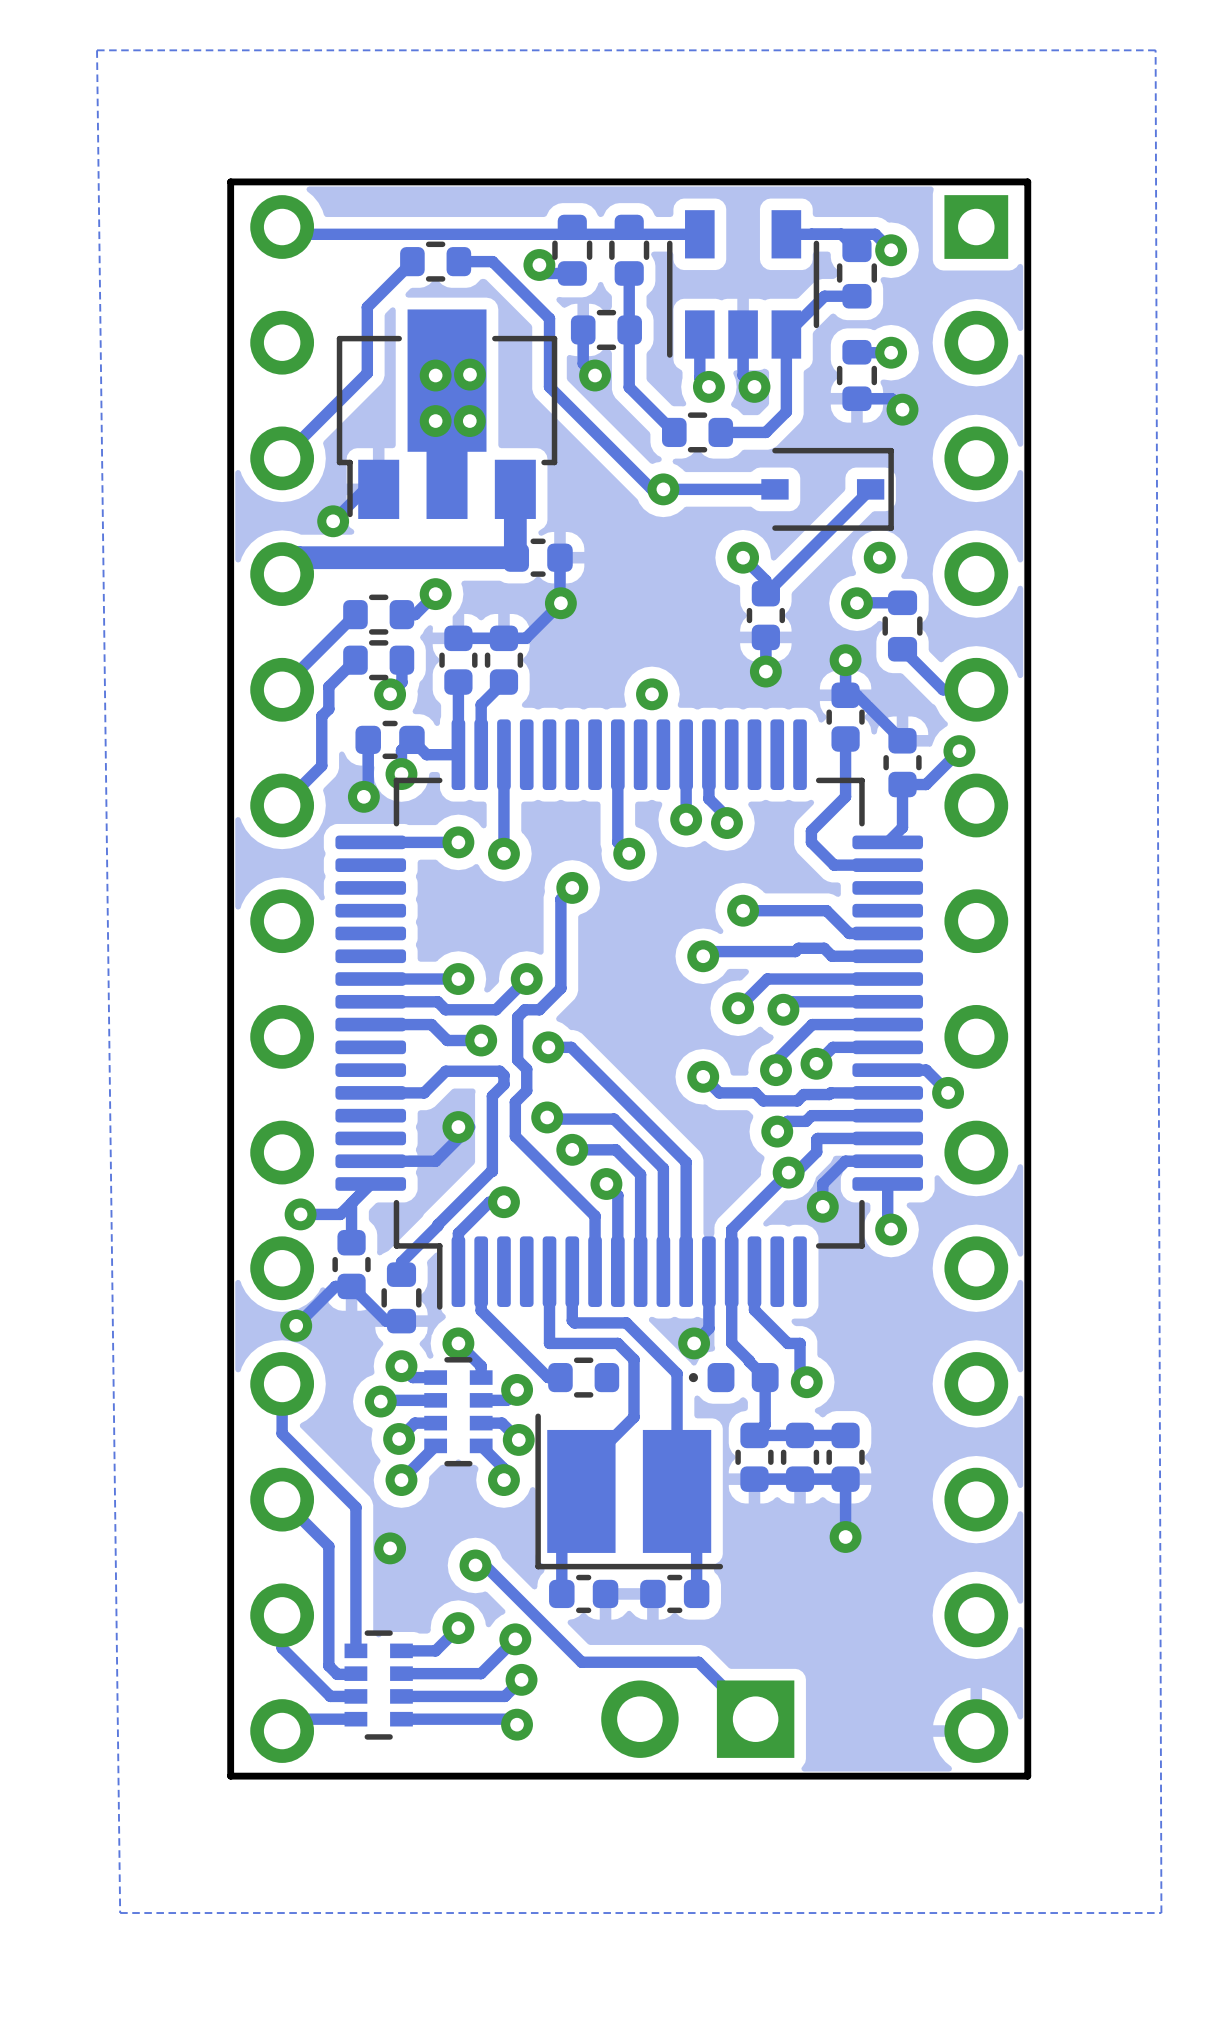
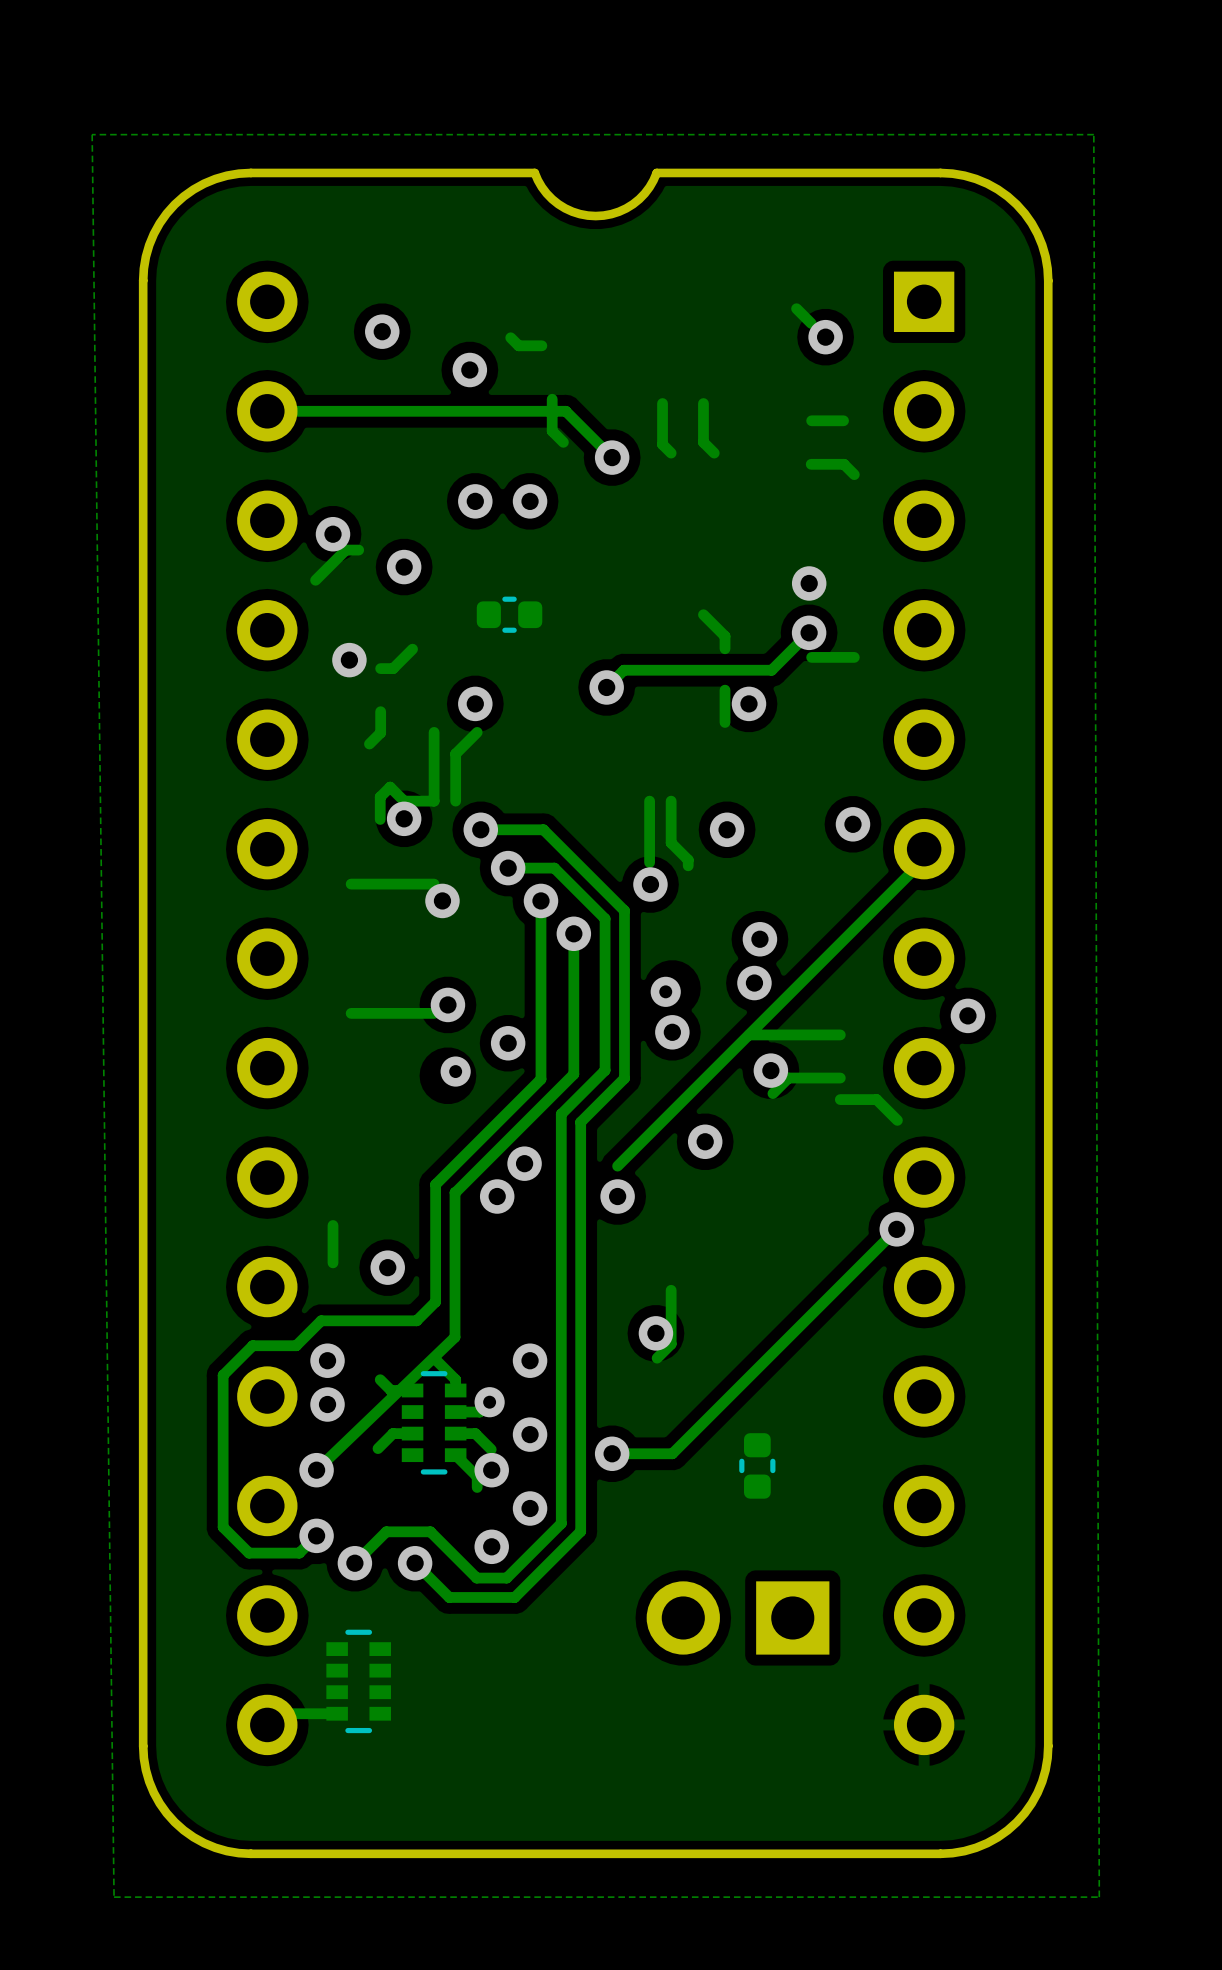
board edge: (1027, 181) (230, 181) (230, 1776) (1027, 1776) (1027, 181) -> (940, 172) (976, 179) (1007, 196) (1024, 213) (1037, 233) (1047, 268) (1048, 1746) (1045, 1770) (1037, 1792) (1024, 1813) (1007, 1830) (976, 1847) (952, 1853) (250, 1853) (226, 1851) (204, 1843) (183, 1830) (159, 1803) (145, 1770) (143, 1746) (143, 280) (145, 256) (153, 233) (166, 213) (183, 196) (204, 183) (238, 173) (534, 172) (541, 187) (558, 204) (579, 214) (595, 216) (619, 211) (633, 204) (649, 187) (656, 172) (940, 172)
track: (282, 227) (289, 234) (699, 234) -> none
track: (786, 234) (875, 234) (891, 250) -> none
part: (572, 250) -> none
part: (629, 250) -> none
via position: (891, 250) -> (825, 337)
via: none -> (382, 331)
part: (435, 261) -> none
track: (458, 261) (492, 261) (549, 318) (549, 386) (651, 489) (774, 489) -> none
track: (412, 262) (367, 307) (367, 373) (282, 458) -> none
via: (539, 265) -> none
track: (629, 273) (629, 387) (674, 432) -> none
part: (856, 273) -> none
part: (743, 284) -> none
track: (856, 296) (824, 296) (786, 334) (786, 411) (765, 432) (720, 432) -> none
via: none -> (469, 370)
part: (606, 329) -> none
track: none -> (267, 411) (565, 411) (612, 457)
via: (891, 352) -> none
via: (469, 374) -> none
via: (435, 375) -> none
via: (595, 375) -> none
part: (856, 375) -> none
via: (708, 386) -> none
via: (754, 386) -> none
via: none -> (612, 457)
via: (902, 409) -> none
part: (447, 414) -> none
via: (435, 421) -> none
via position: (469, 421) -> (475, 501)
part: (697, 432) -> none
via: none -> (530, 501)
via: none -> (333, 534)
track: (515, 489) (516, 557) (298, 557) (282, 574) -> none
via: (663, 489) -> none
part: (827, 489) -> none
track: (870, 489) (766, 593) -> none
via: none -> (404, 567)
via: (333, 521) -> none
via: none -> (809, 583)
track: (559, 557) (560, 603) (525, 638) (458, 638) -> none
via: (743, 557) -> none
via: (879, 557) -> none
track: none -> (809, 632) (771, 670) (623, 670) (606, 687)
via: none -> (809, 632)
via: (435, 594) -> none
via: (560, 603) -> none
via: (856, 603) -> none
via: none -> (349, 660)
track: (355, 614) (282, 689) -> none
part: (378, 614) -> none
part: (765, 615) -> none
part: (902, 626) -> none
via: none -> (606, 687)
track: (902, 649) (943, 689) (976, 689) -> none
via: none -> (475, 703)
track: (355, 660) (328, 686) (328, 709) (321, 716) (321, 765) (282, 805) -> none
part: (378, 660) -> none
part: (458, 660) -> none
part: (503, 660) -> none
track: (845, 660) (845, 695) (856, 695) (902, 740) -> none
via: (845, 660) -> none
via position: (765, 671) -> (748, 703)
via: (390, 694) -> none
via: (651, 694) -> none
part: (845, 717) -> none
track: (845, 738) (845, 796) (811, 830) (811, 842) (834, 865) (887, 865) -> none
track: (368, 739) (368, 792) (363, 796) -> none
part: (390, 739) -> none
track: (959, 751) (926, 784) (902, 784) (902, 827) (887, 842) -> none
via: (959, 751) -> none
track: (503, 754) (503, 853) -> none
track: (617, 754) (617, 842) (629, 853) -> none
part: (902, 762) -> none
via position: (401, 774) -> (404, 818)
via: none -> (852, 824)
track: none -> (480, 829) (543, 829) (624, 910) (624, 1078) (580, 1122) (580, 1531) (514, 1597) (449, 1597) (415, 1563)
via: none -> (480, 829)
via: none -> (727, 829)
via: (363, 796) -> none
via position: (686, 819) -> (650, 884)
via: (726, 823) -> none
track: none -> (508, 868) (554, 868) (605, 918) (605, 1070) (561, 1114) (561, 1523) (506, 1578) (476, 1578) (430, 1531) (386, 1531) (354, 1563)
via position: (458, 842) -> (442, 900)
via position: (503, 853) -> (508, 868)
via: (629, 853) -> none
track: none -> (540, 900) (540, 1079) (435, 1184) (435, 1301) (416, 1320) (321, 1320) (296, 1345) (252, 1345) (223, 1375) (223, 1527) (249, 1553) (299, 1553) (316, 1535)
via: none -> (540, 900)
track: (572, 887) (560, 899) (560, 988) (539, 1009) (524, 1009) (517, 1017) (517, 1060) (526, 1069) (526, 1090) (515, 1102) (515, 1136) (595, 1216) (595, 1271) -> none
via: (572, 887) -> none
track: none -> (573, 933) (573, 1074) (455, 1192)
via: none -> (573, 933)
via: none -> (759, 939)
track: (743, 910) (826, 910) (849, 933) (887, 933) -> none
via: (743, 910) -> none
via: none -> (754, 983)
track: (887, 956) (832, 956) (824, 948) (798, 948) (795, 951) (707, 951) (703, 956) -> none
via position: (458, 979) -> (447, 1004)
track: (526, 979) (495, 1009) (445, 1009) (437, 1001) (370, 1001) -> none
via position: (526, 979) -> (508, 1043)
track: (887, 979) (767, 979) (738, 1008) -> none
via: none -> (967, 1015)
via position: (738, 1008) -> (672, 1032)
via: (783, 1009) -> none
part: (629, 1014) -> none
track: (370, 1024) (431, 1024) (447, 1040) (481, 1040) -> none
track: (887, 1024) (812, 1024) (776, 1060) (776, 1070) -> none
via: none -> (770, 1070)
track: (548, 1047) (571, 1047) (686, 1162) (686, 1271) -> none
via: (548, 1047) -> none
via: (816, 1063) -> none
via: (776, 1070) -> none
track: (703, 1076) (719, 1092) (755, 1092) (763, 1100) (797, 1100) (803, 1094) (887, 1092) -> none
via: (703, 1076) -> none
track: (370, 1092) (424, 1092) (445, 1071) (499, 1071) (503, 1075) (503, 1084) (492, 1096) (492, 1171) (401, 1262) (401, 1274) -> none
via: (948, 1092) -> none
track: (887, 1115) (811, 1115) (805, 1121) (787, 1121) (777, 1131) -> none
track: (547, 1117) (614, 1119) (663, 1168) (663, 1271) -> none
via: (547, 1117) -> none
via: (458, 1127) -> none
track: (469, 1127) (435, 1161) (370, 1161) -> none
via position: (777, 1131) -> (705, 1141)
via: none -> (524, 1163)
track: (887, 1138) (817, 1138) (816, 1152) (796, 1172) (788, 1172) (731, 1229) (731, 1343) (765, 1377) (765, 1424) (754, 1435) (845, 1435) -> none
track: (572, 1149) (615, 1149) (640, 1174) (640, 1271) -> none
via: (572, 1149) -> none
track: (887, 1161) (845, 1161) (822, 1183) (822, 1206) -> none
track: none -> (455, 1192) (455, 1337) (316, 1470)
via: none -> (617, 1196)
via: (788, 1172) -> none
track: (370, 1183) (340, 1214) (300, 1214) -> none
track: (606, 1183) (617, 1195) (617, 1271) -> none
via: (606, 1183) -> none
track: (887, 1183) (887, 1226) (891, 1229) -> none
track: (503, 1202) (489, 1202) (458, 1233) (458, 1271) -> none
via position: (503, 1202) -> (497, 1196)
via: (822, 1206) -> none
track: none -> (896, 1229) (672, 1453) (612, 1453)
via: none -> (896, 1229)
via: (300, 1214) -> none
via: (891, 1229) -> none
via: none -> (387, 1267)
part: (351, 1264) -> none
track: (481, 1271) (481, 1310) (548, 1377) (560, 1377) -> none
track: (549, 1271) (549, 1343) (617, 1343) (634, 1359) (634, 1417) (581, 1469) (581, 1491) (561, 1511) (561, 1593) -> none
track: (572, 1271) (572, 1320) (574, 1322) (626, 1322) (677, 1373) (677, 1491) (696, 1511) (696, 1593) -> none
track: (754, 1271) (754, 1310) (787, 1343) (800, 1343) (800, 1375) (806, 1382) -> none
part: (401, 1297) -> none
track: (401, 1321) (386, 1321) (351, 1286) (335, 1286) (296, 1325) -> none
via: (296, 1325) -> none
via: (458, 1343) -> none
via position: (694, 1343) -> (655, 1333)
via: none -> (327, 1360)
via: none -> (530, 1360)
via: (401, 1366) -> none
part: (583, 1377) -> none
part: (733, 1377) -> none
via: (806, 1382) -> none
track: (282, 1383) (282, 1433) (355, 1507) (355, 1650) -> none
via: none -> (327, 1404)
track: (435, 1400) (380, 1401) -> none
via: (380, 1401) -> none
via: none -> (530, 1434)
via: (399, 1438) -> none
via: (518, 1439) -> none
via: none -> (612, 1453)
track: (435, 1445) (401, 1480) -> none
part: (754, 1457) -> none
part: (845, 1457) -> none
via: none -> (316, 1470)
via: none -> (491, 1470)
track: (754, 1479) (845, 1479) (845, 1537) -> none
via: (401, 1480) -> none
via: (503, 1480) -> none
part: (629, 1491) -> none
track: (282, 1499) (328, 1546) (328, 1665) (337, 1674) (355, 1673) -> none
via: none -> (530, 1508)
via: none -> (316, 1535)
via: (845, 1537) -> none
via: none -> (491, 1546)
via position: (390, 1548) -> (354, 1563)
via: none -> (415, 1563)
track: (475, 1565) (484, 1565) (581, 1662) (698, 1662) (755, 1719) -> none
via: (475, 1565) -> none
part: (583, 1593) -> none
part: (674, 1593) -> none
track: (282, 1615) (282, 1648) (330, 1696) (355, 1696) -> none
track: (458, 1628) (435, 1650) (401, 1650) -> none
via: (458, 1628) -> none
track: (515, 1639) (481, 1673) (401, 1673) -> none
via: (515, 1639) -> none
track: (521, 1679) (504, 1696) (401, 1696) -> none
via: (521, 1679) -> none
track: (401, 1719) (511, 1719) (517, 1724) -> none
part position: (697, 1719) -> (738, 1617)
via: (517, 1724) -> none

